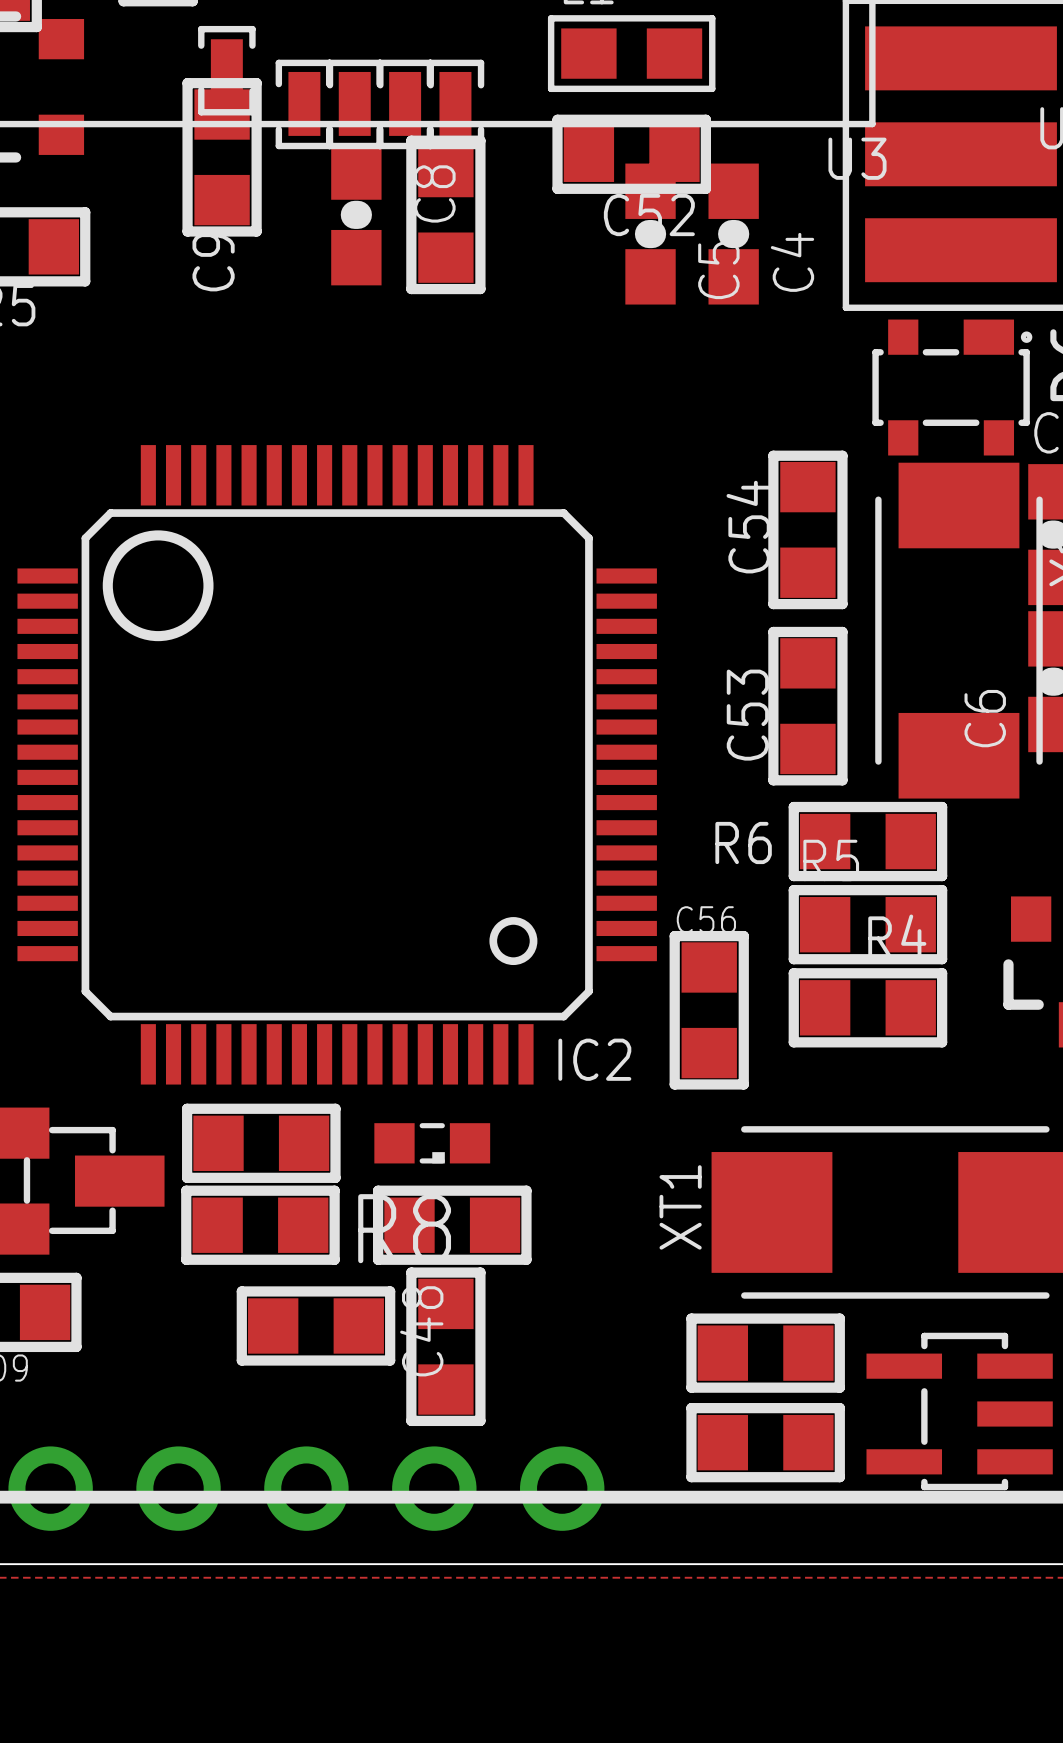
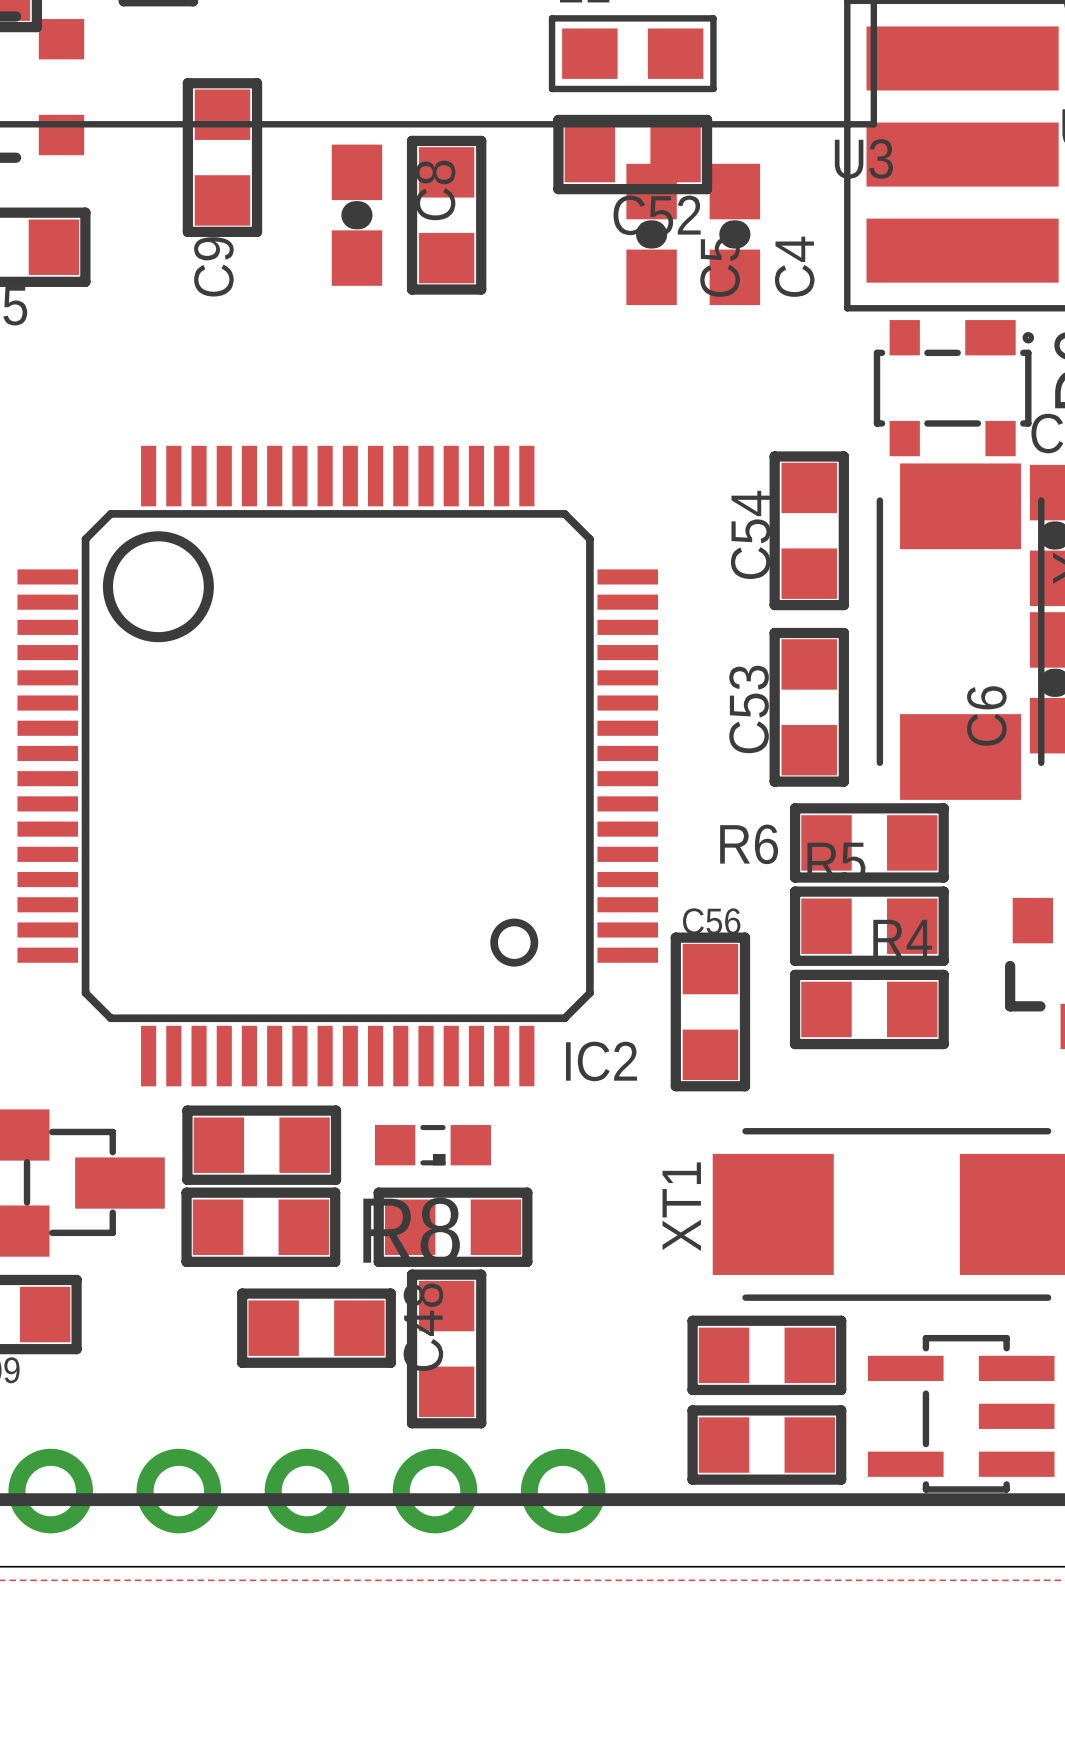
part: (226, 70) -> none
part: (304, 104) -> none
part: (354, 104) -> none
part: (405, 104) -> none
part: (455, 104) -> none

